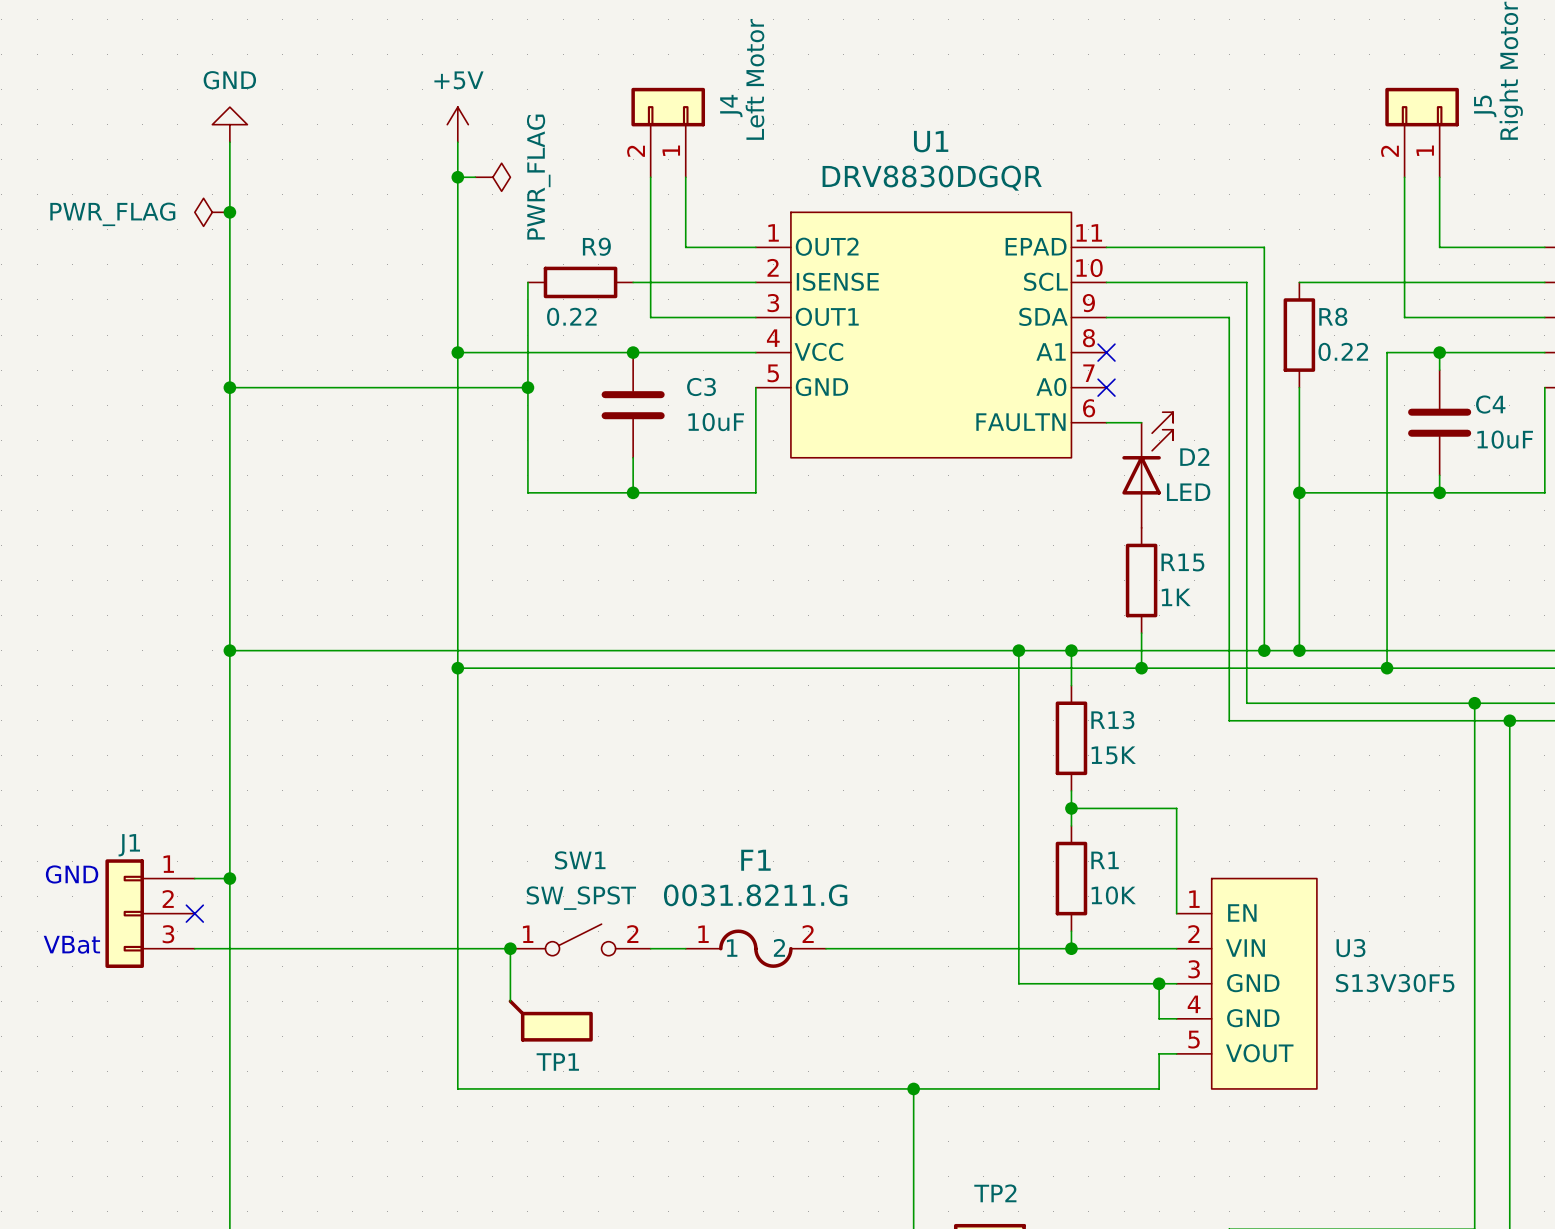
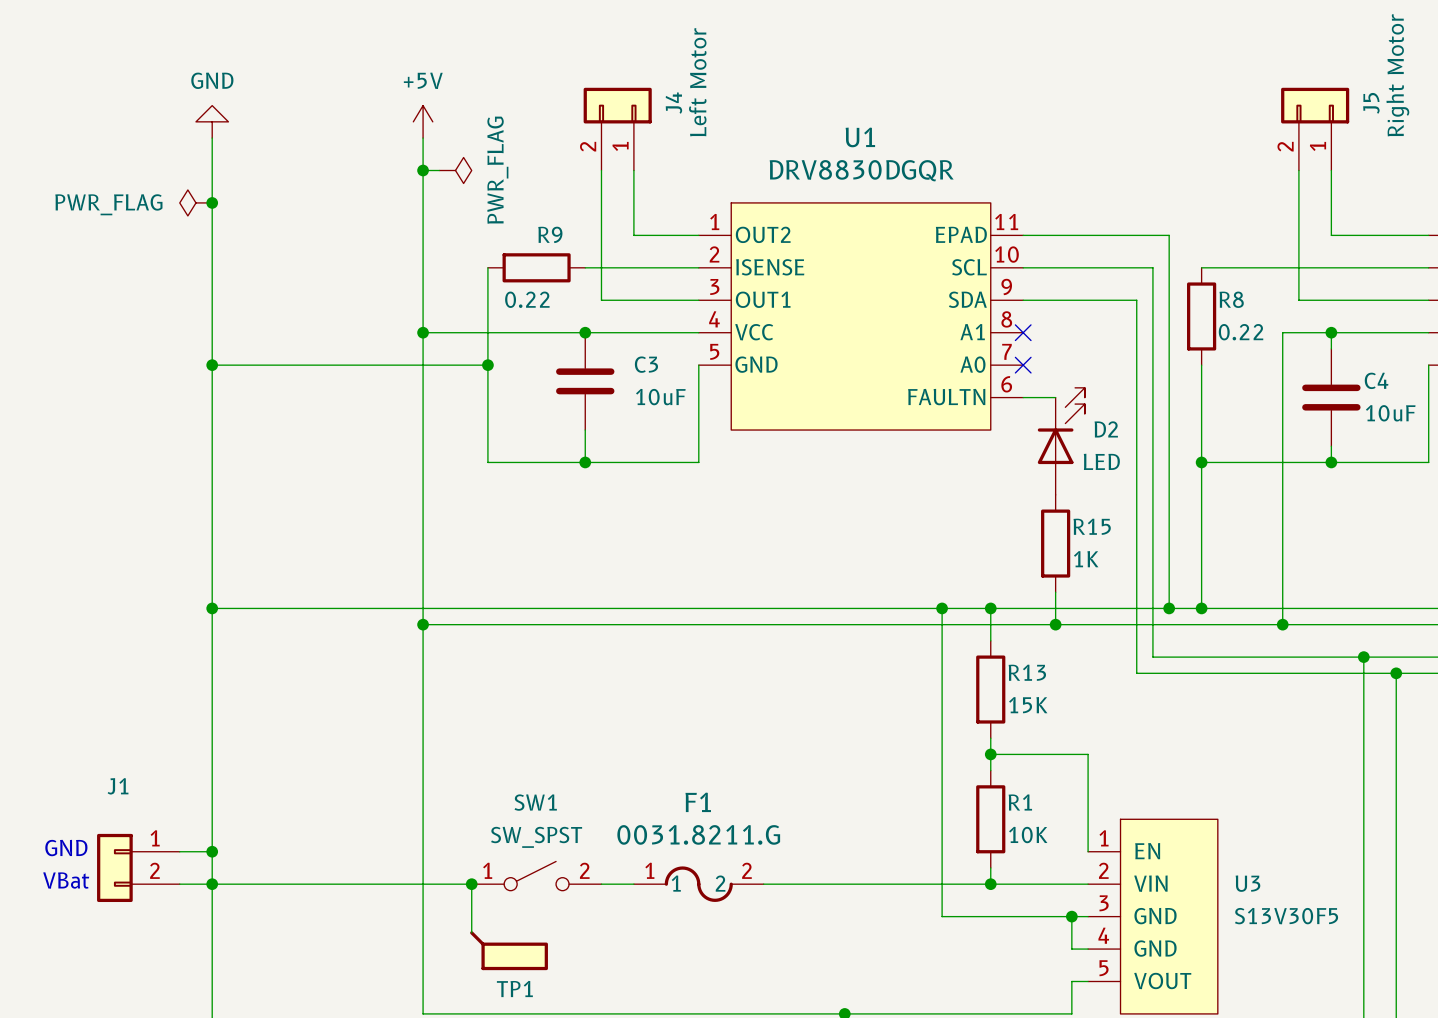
J1 symbol: [105, 859, 195, 968] -> [97, 833, 180, 903]
text position: GND (72, 874) -> GND (66, 848)
wire: (194, 878) (229, 878) -> (179, 851) (212, 851)
junction: (229, 878) -> none
no-connect mark: (194, 913) -> none
junction: none -> (212, 851)
junction: none -> (212, 884)

